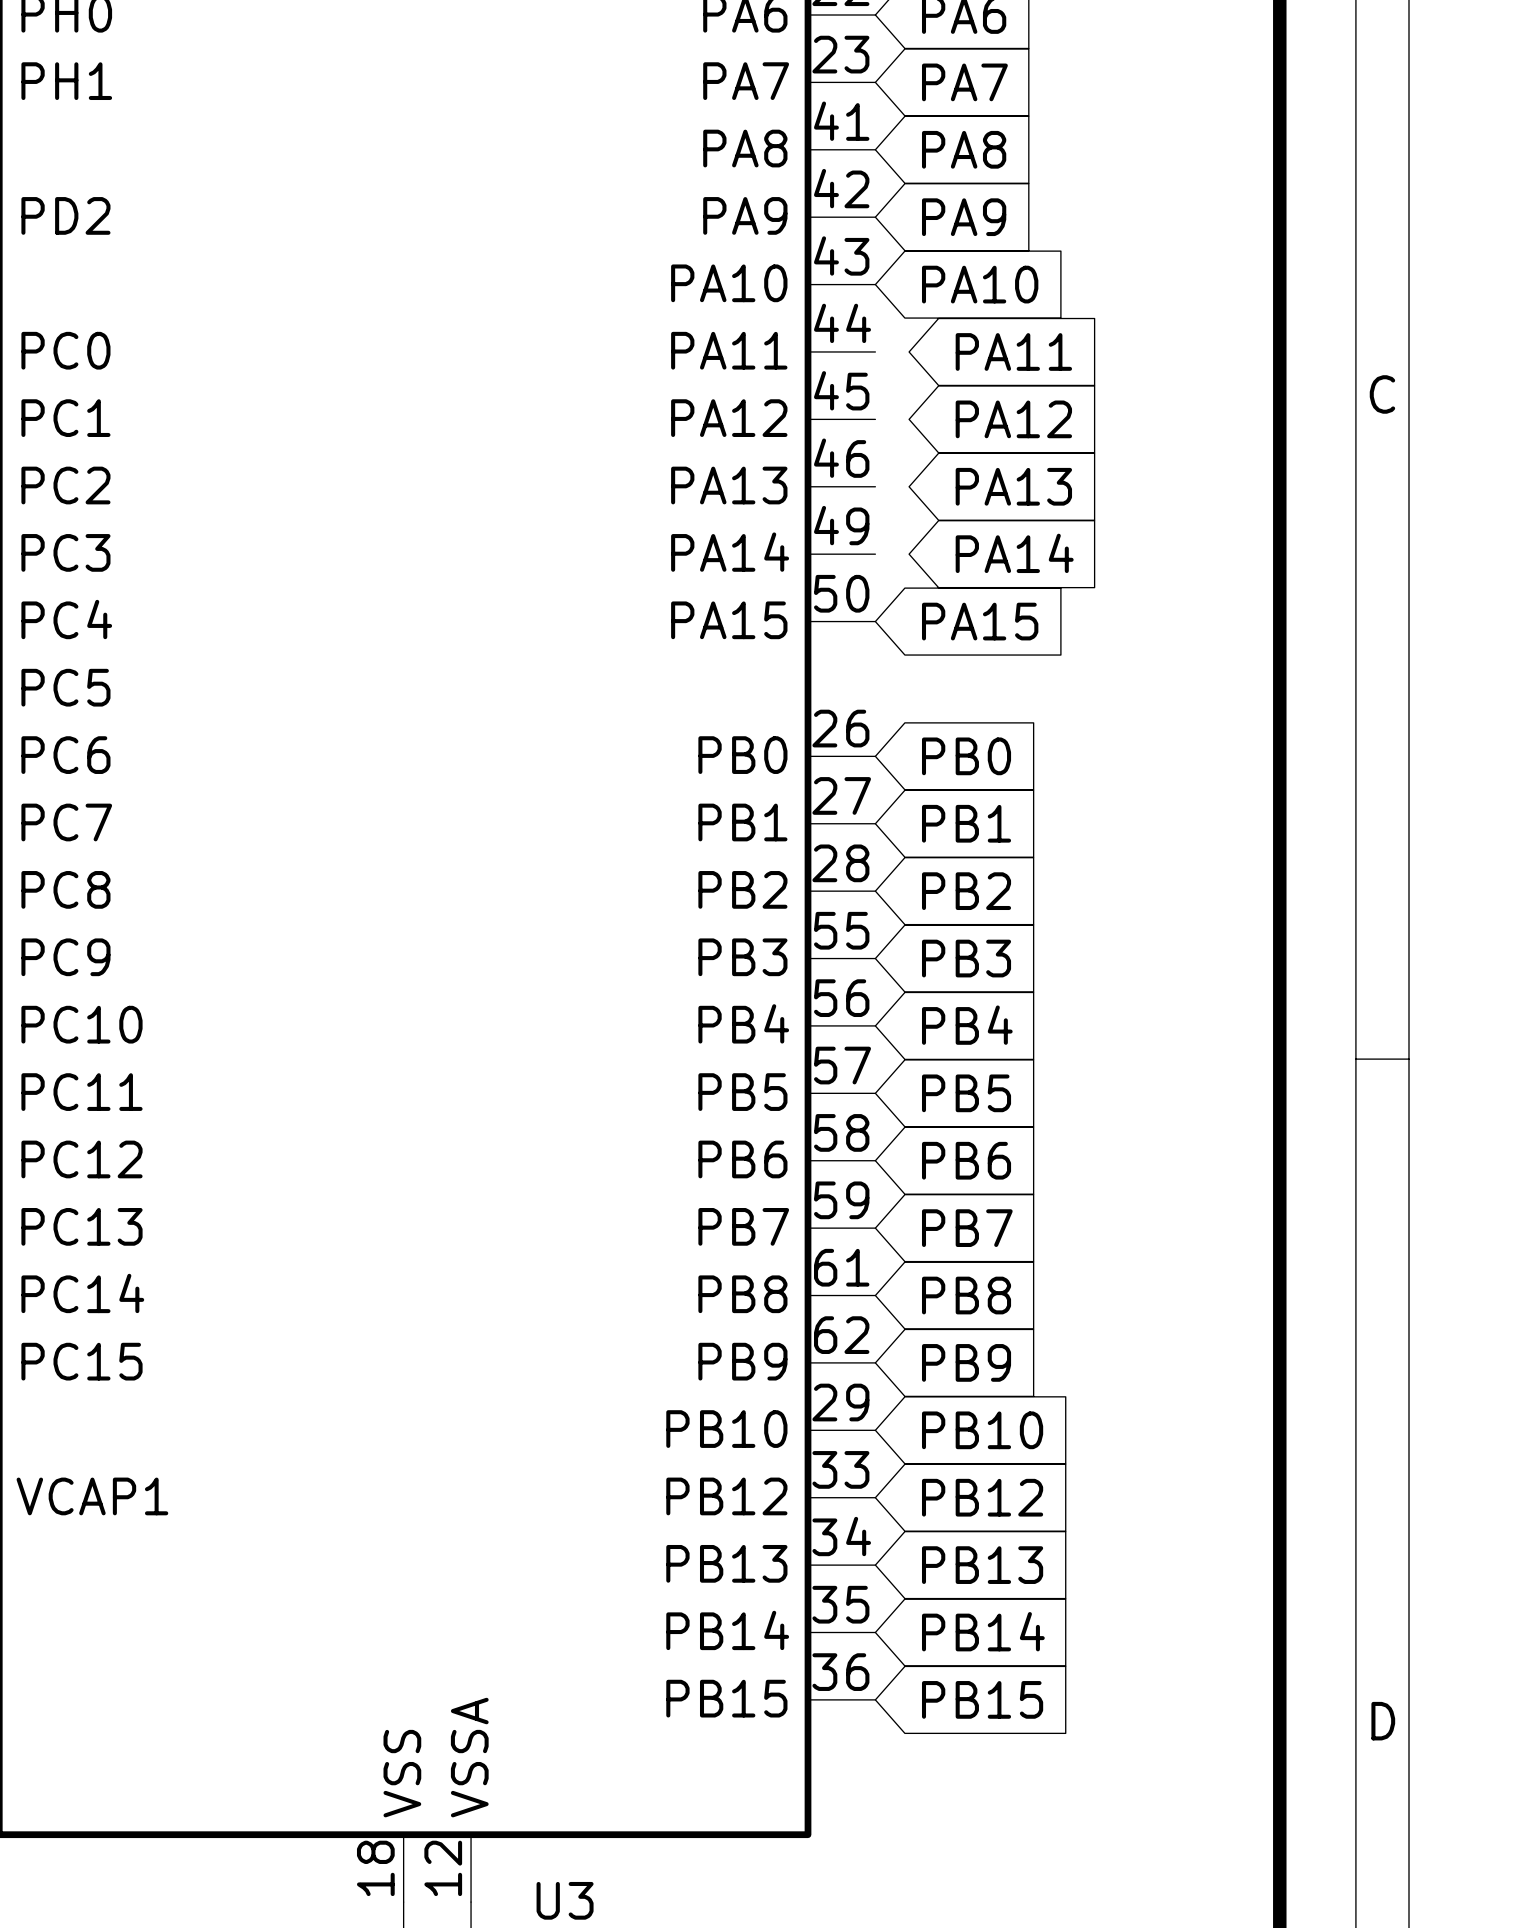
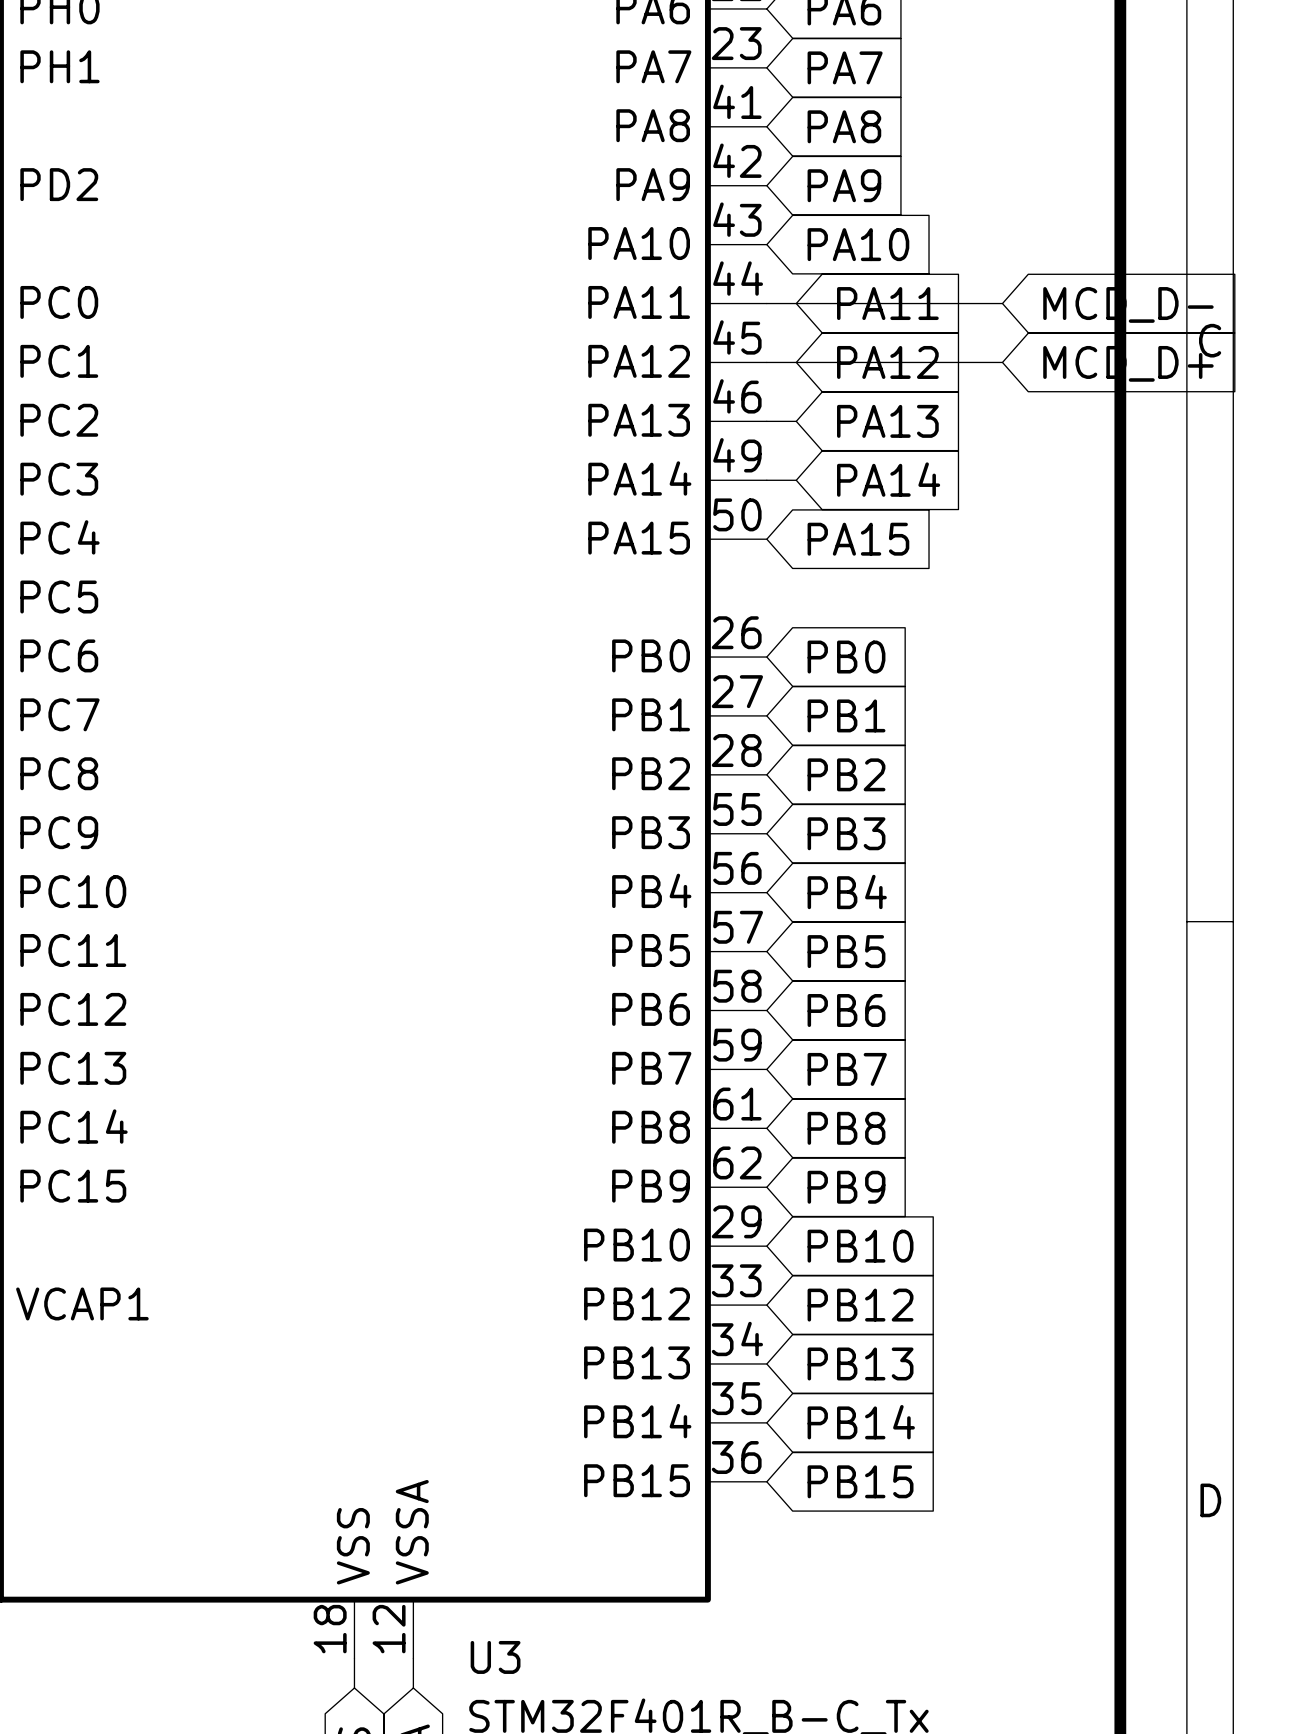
wire: none -> (766, 303) (1002, 303)
global label: none -> MCD_D- (1128, 304)
wire: none -> (766, 362) (1002, 362)
global label: none -> MCD_D+ (1128, 363)
wire: none -> (766, 421) (796, 421)
wire: none -> (766, 480) (796, 480)

